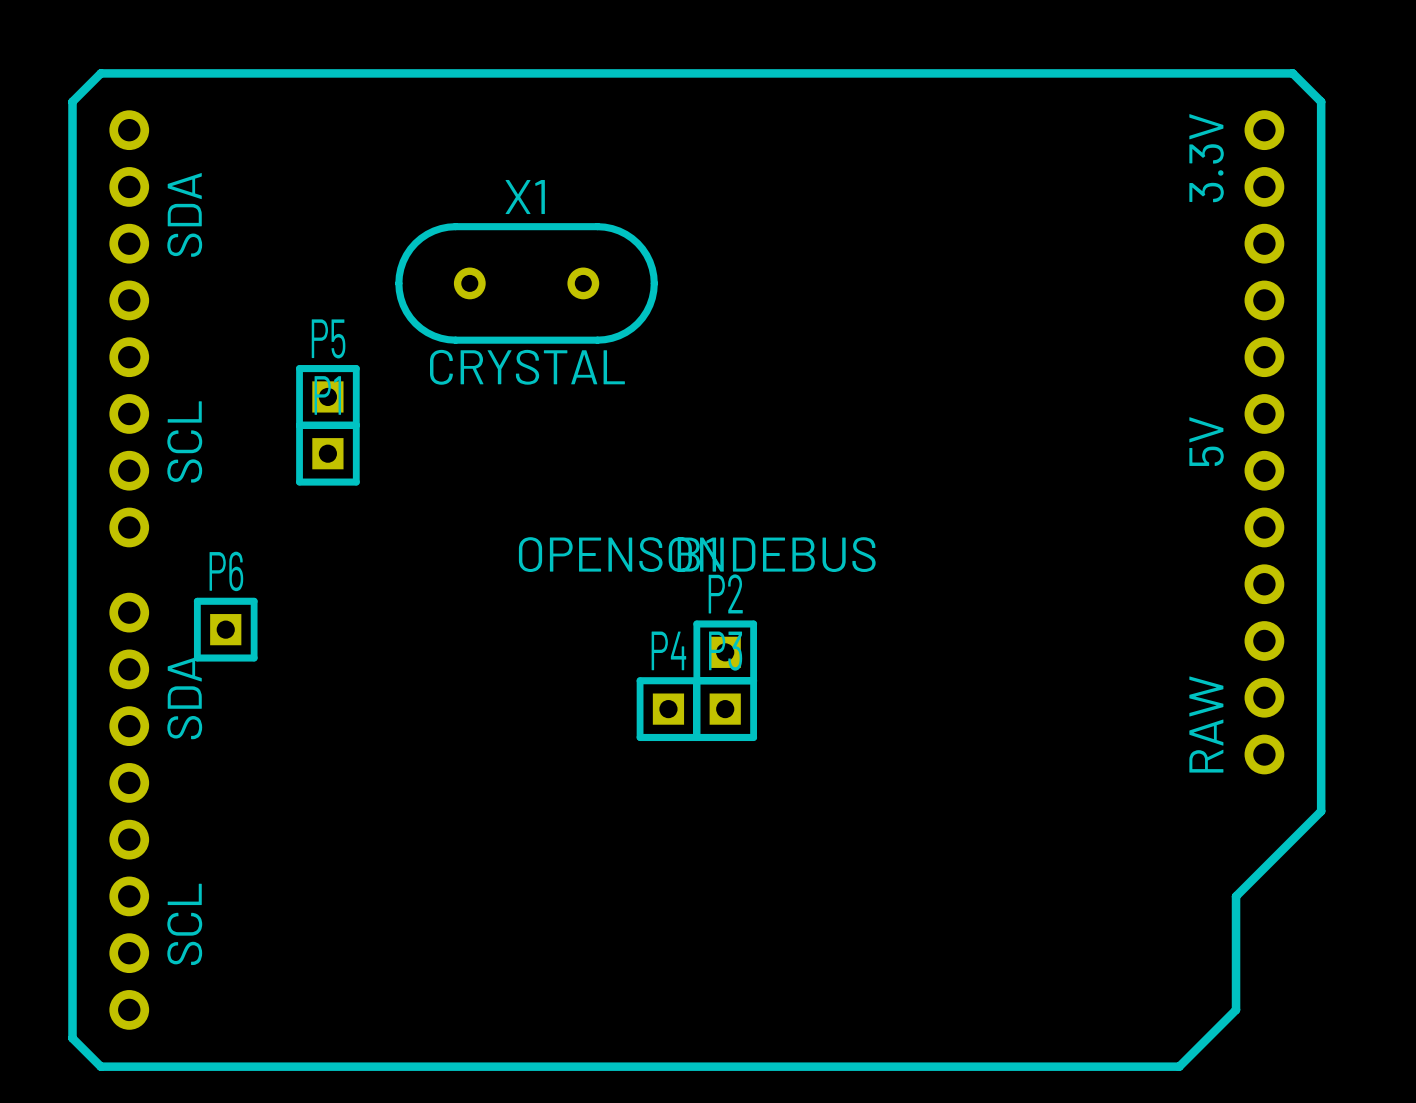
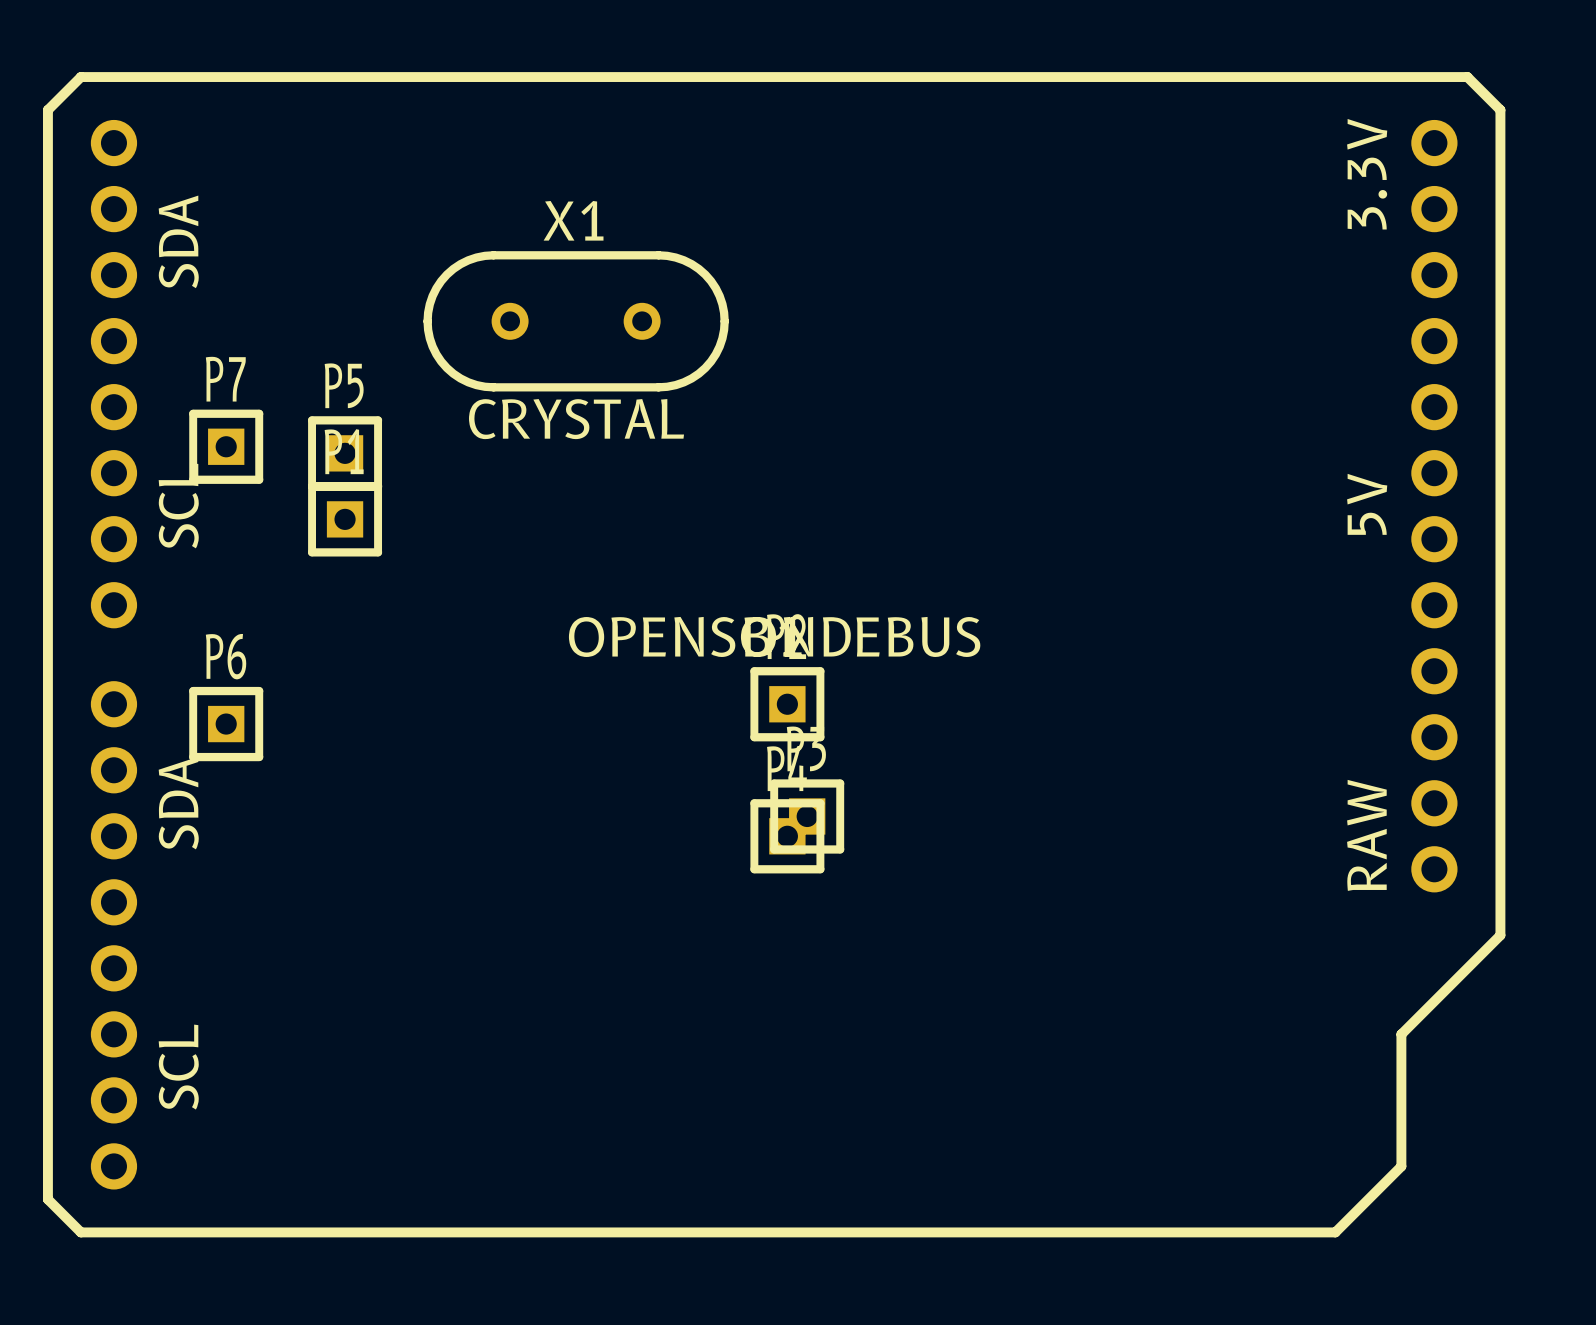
P7: none -> (226, 446)
P2 position: (725, 652) -> (787, 704)
P4 position: (668, 709) -> (787, 836)

